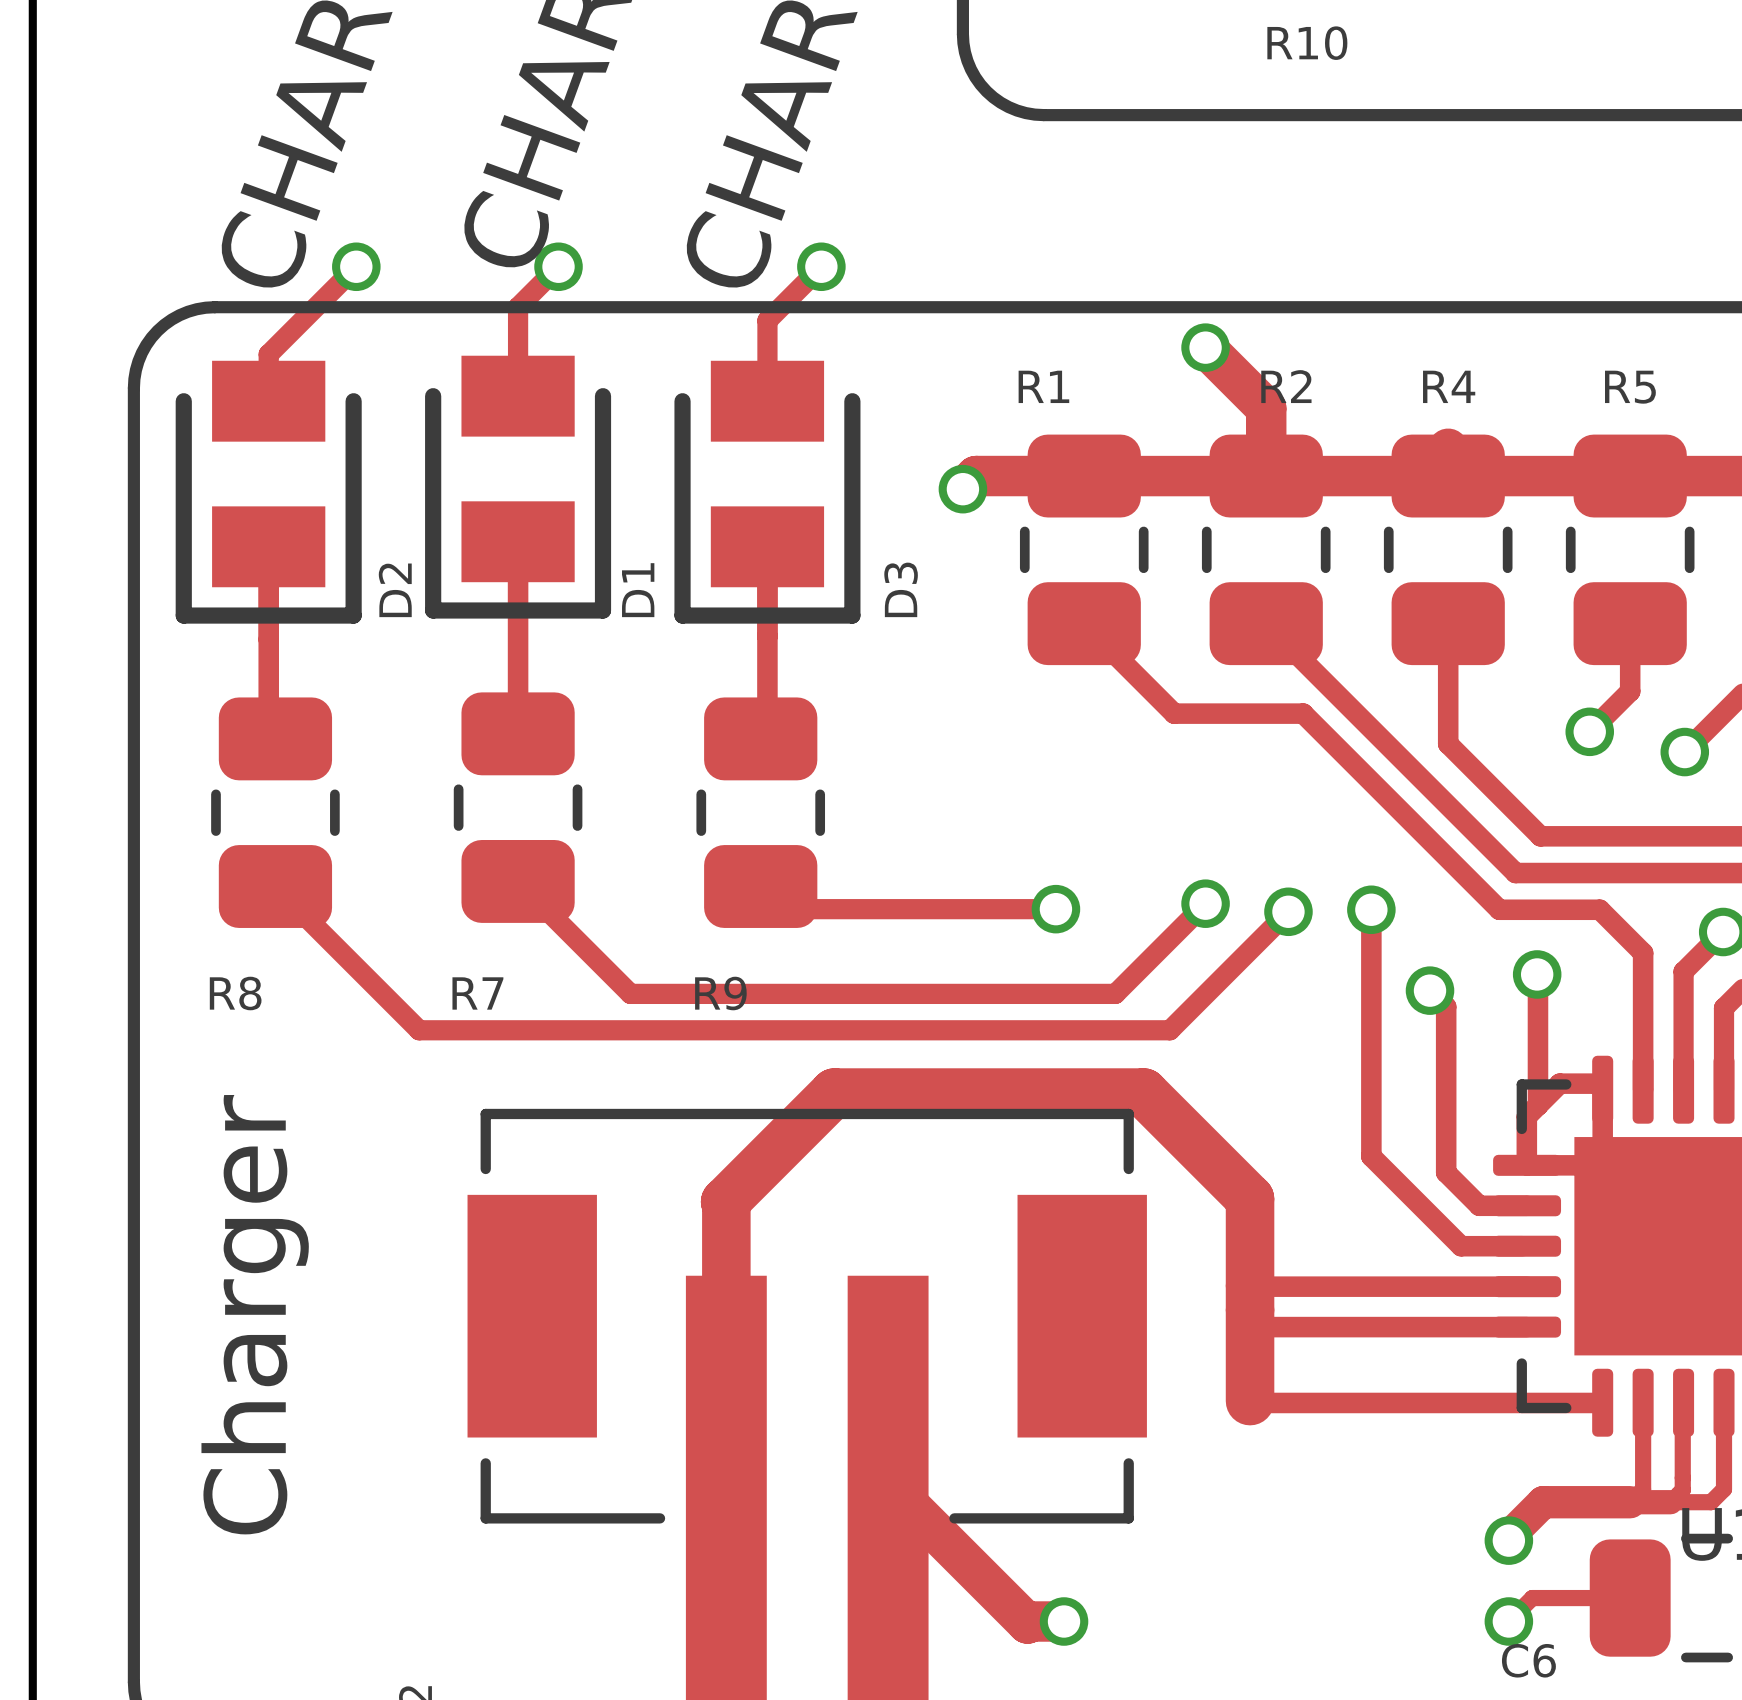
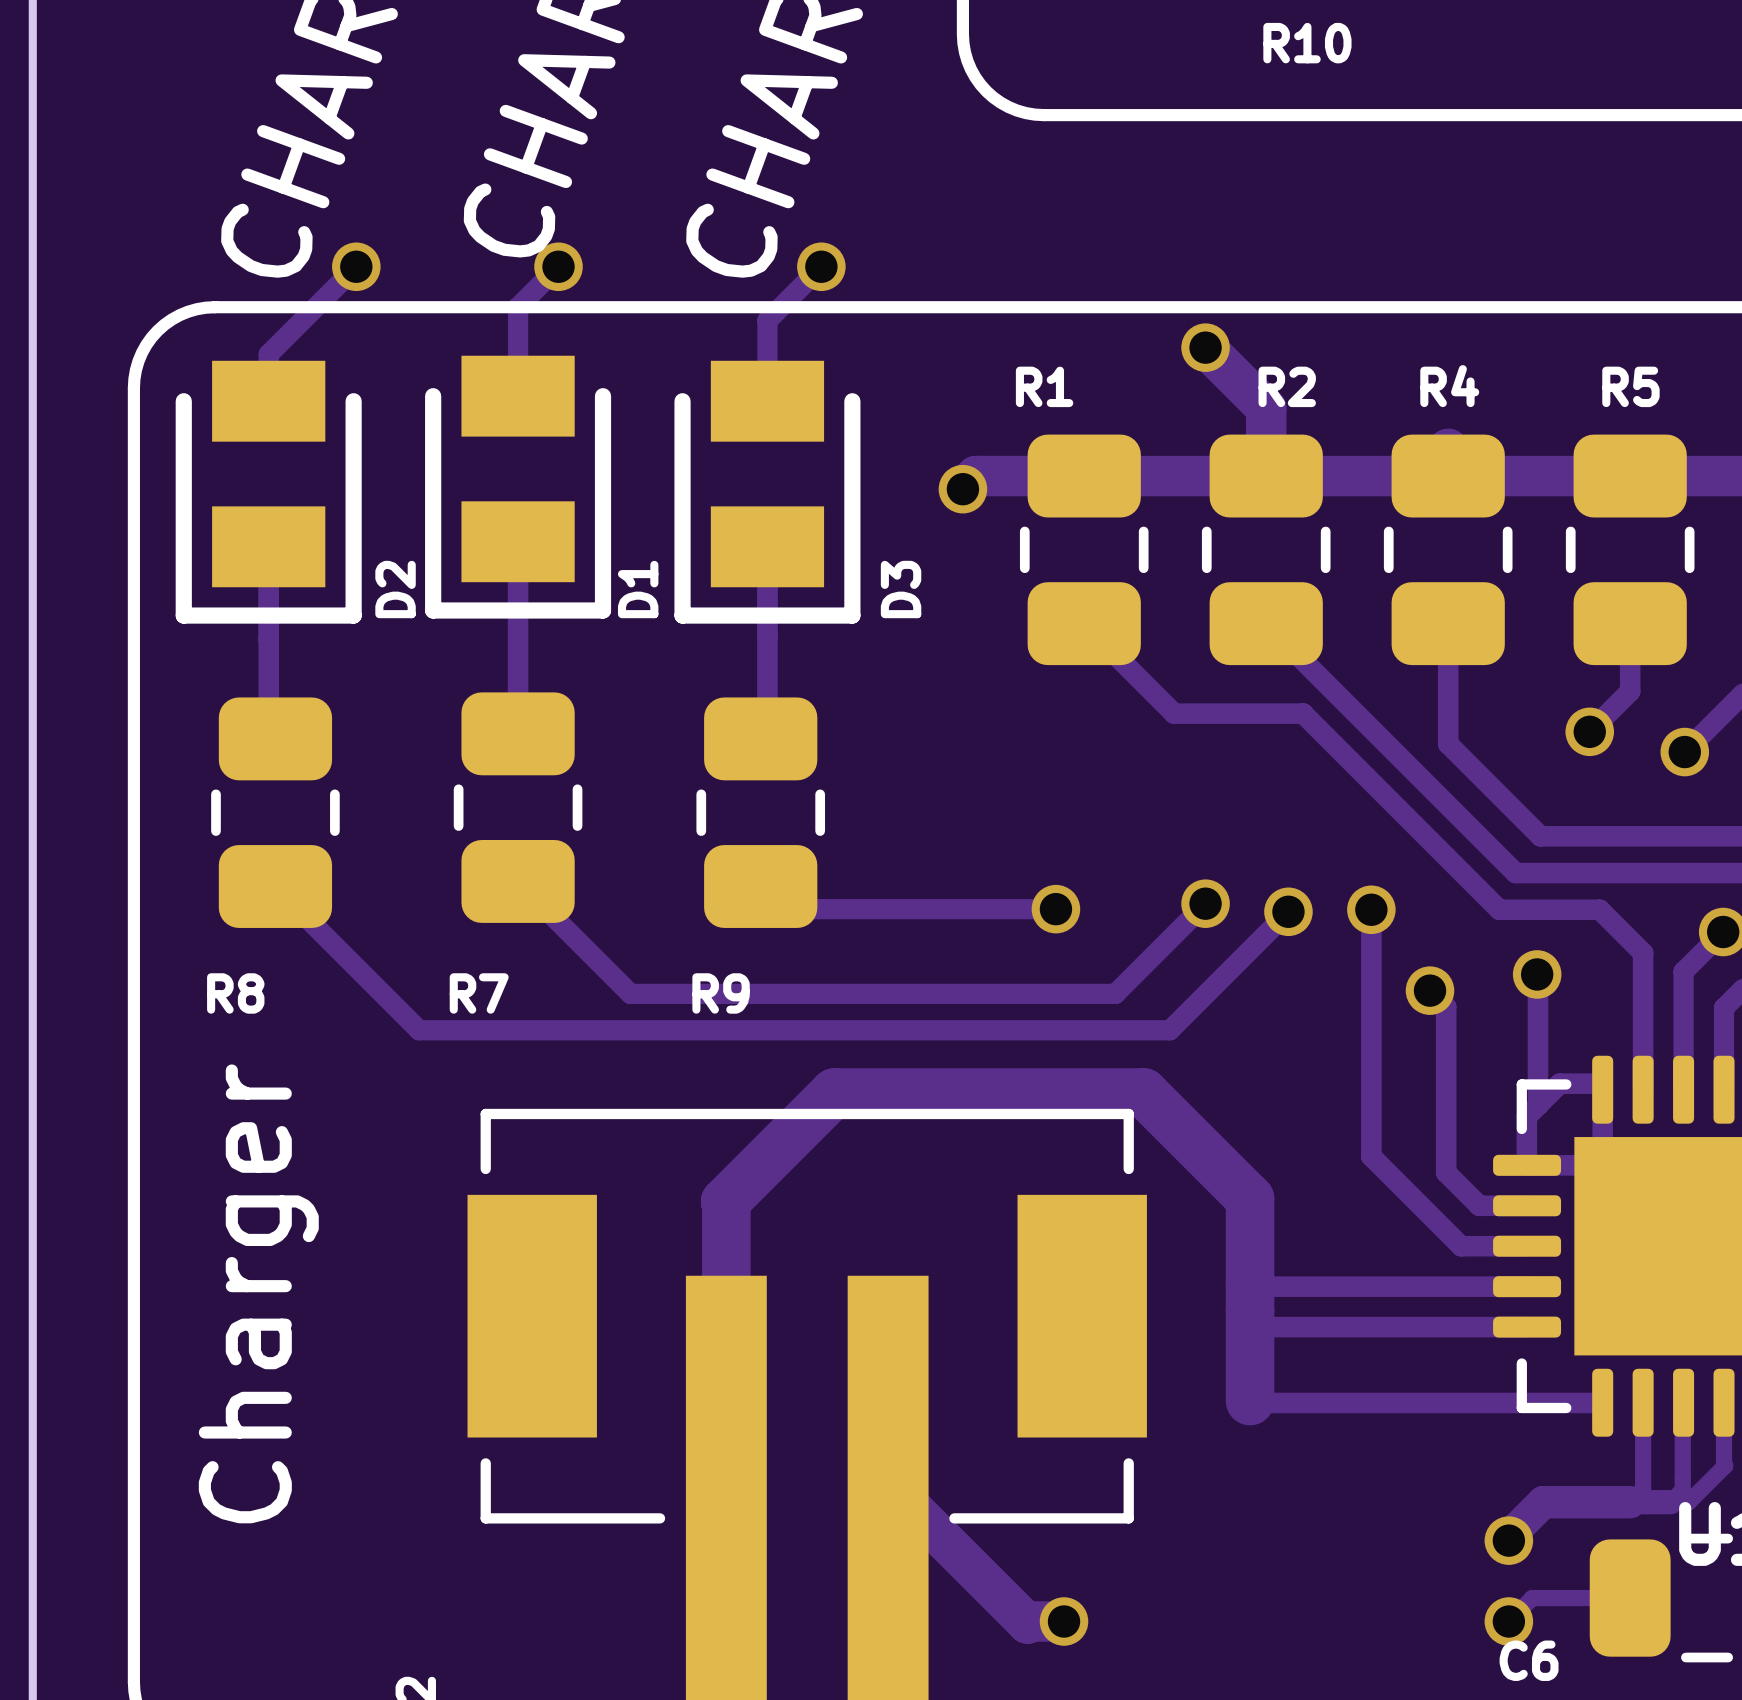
track: (1724, 1464) (1724, 1489) (1711, 1502) (1688, 1502) -> (1724, 1464) (1725, 1465) (1688, 1502)

